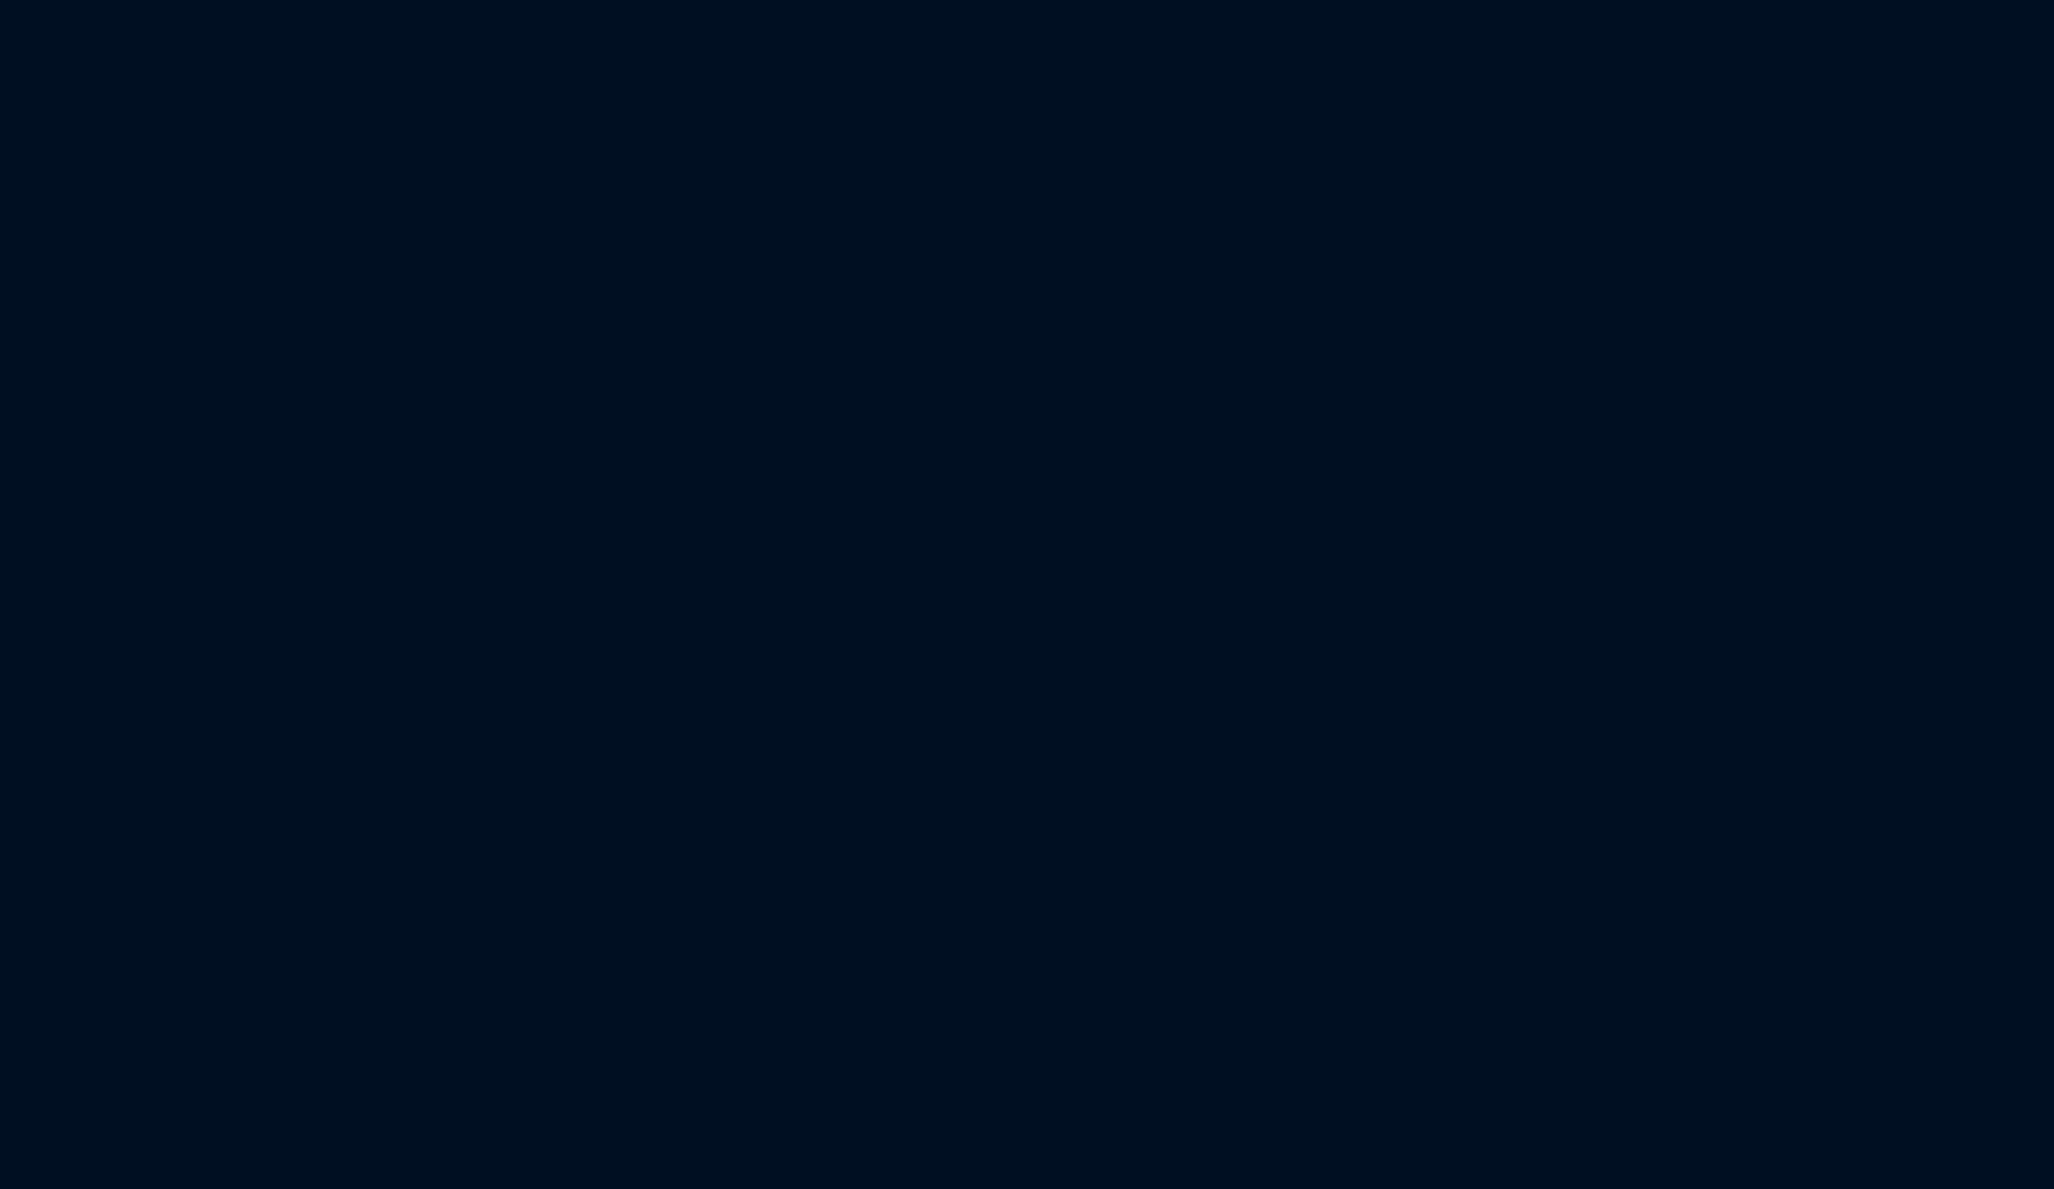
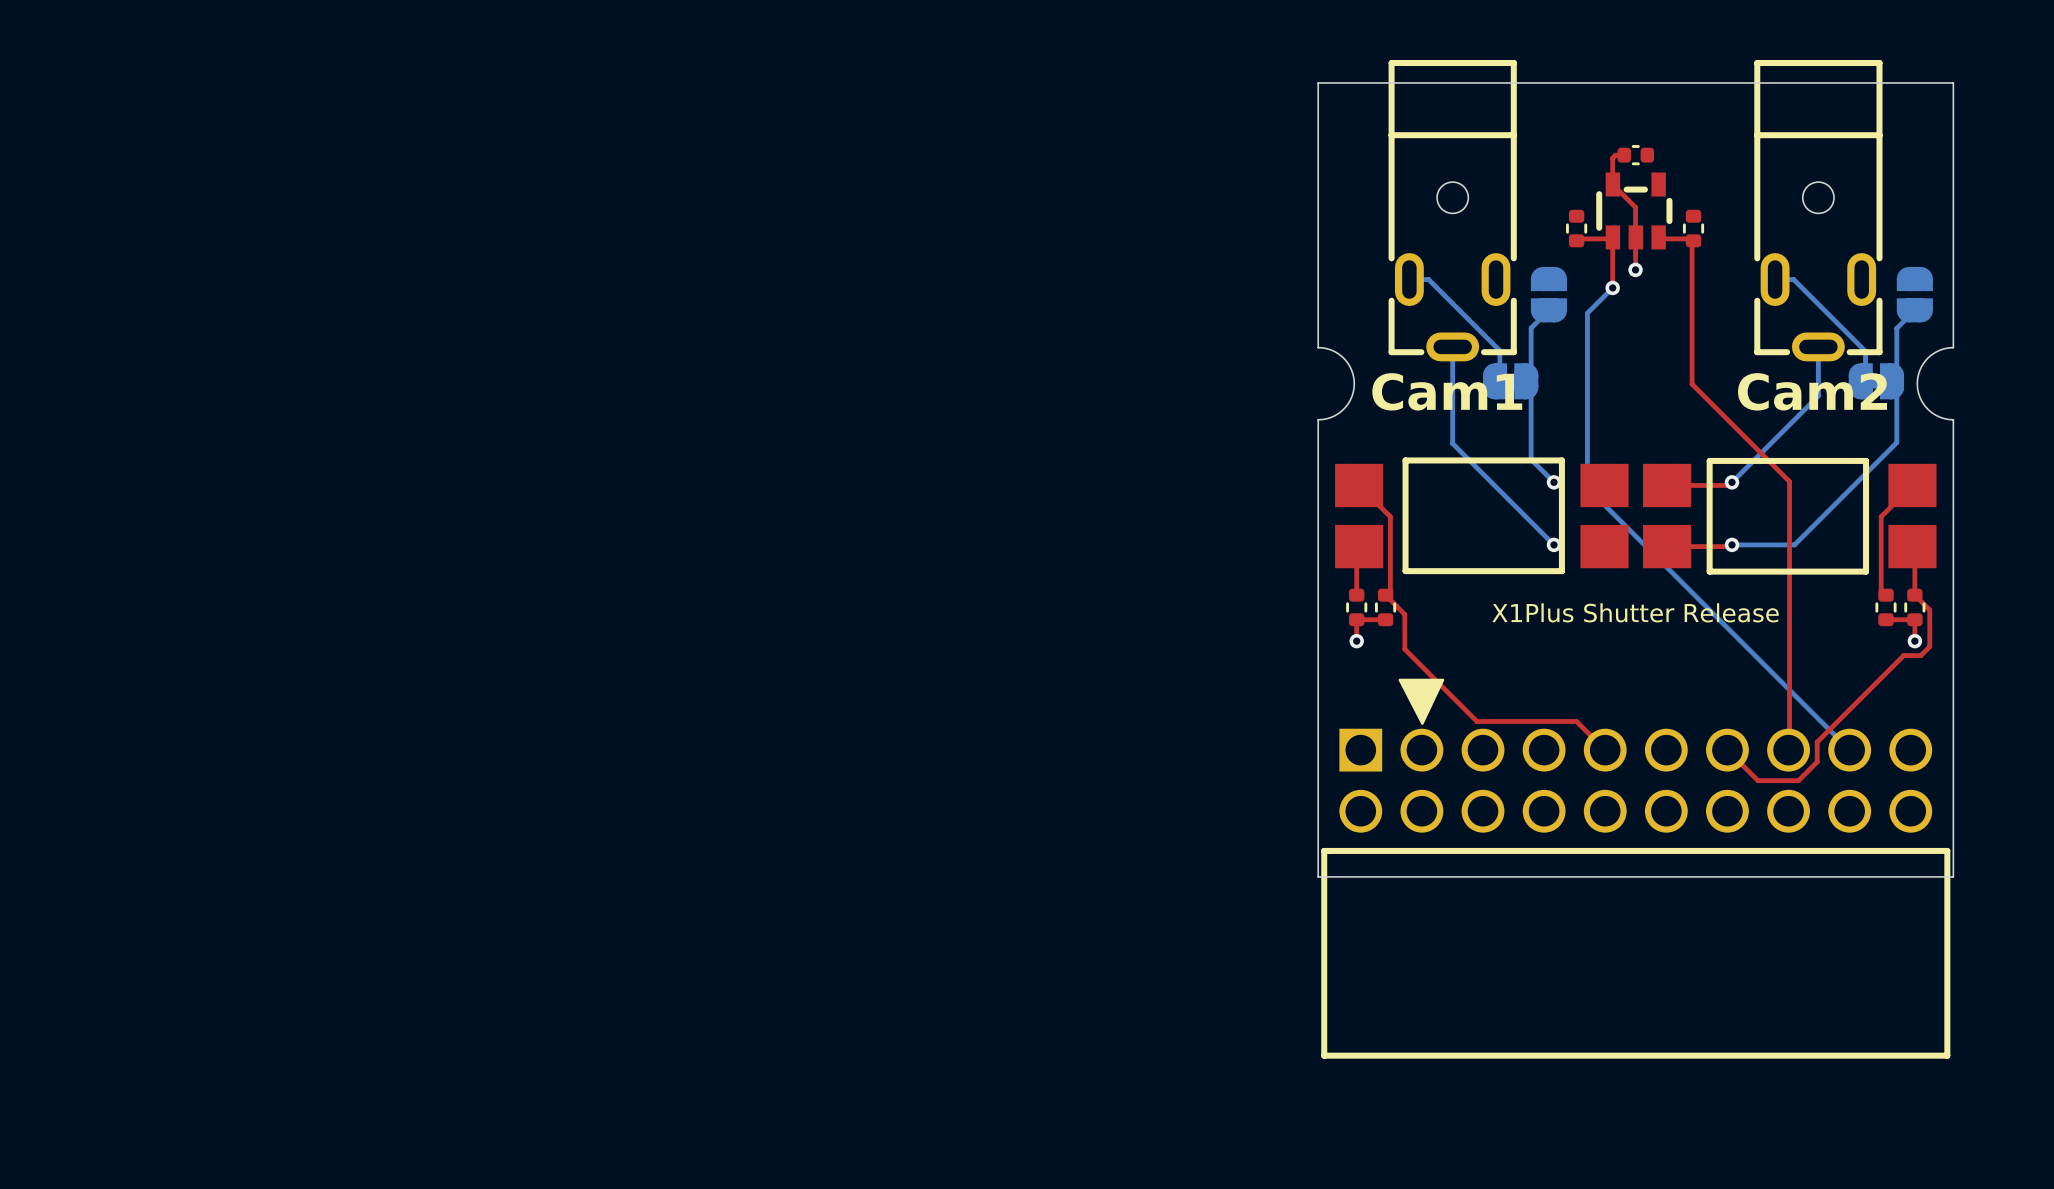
board edge: none -> (1318, 82) (1318, 347) (1334, 351) (1345, 359) (1351, 370) (1354, 383) (1351, 396) (1345, 407) (1334, 415) (1318, 419) (1318, 876) (1953, 876) (1953, 419) (1939, 417) (1927, 409) (1920, 397) (1917, 383) (1920, 369) (1927, 358) (1939, 350) (1953, 347) (1953, 82) (1318, 82)
top track: none -> (1624, 155) (1615, 155) (1612, 158) (1612, 184) (1635, 207) (1635, 269)
part: none -> (1635, 155)
part: none -> (1452, 210)
part: none -> (1634, 210)
part: none -> (1818, 210)
part: none -> (1576, 228)
part: none -> (1693, 228)
top track: none -> (1658, 237) (1692, 238) (1692, 384) (1789, 481) (1788, 750)
top track: none -> (1576, 238) (1612, 237) (1612, 287)
via: none -> (1635, 269)
bottom track: none -> (1409, 279) (1428, 279) (1499, 350) (1499, 381)
bottom track: none -> (1775, 279) (1793, 279) (1865, 351) (1865, 381)
bottom track: none -> (1612, 287) (1587, 313) (1587, 487) (1849, 750)
via: none -> (1612, 287)
part: none -> (1548, 294)
part: none -> (1914, 294)
bottom track: none -> (1548, 310) (1531, 328) (1531, 459) (1553, 482)
bottom track: none -> (1914, 310) (1896, 328) (1896, 442) (1794, 544) (1732, 544)
bottom track: none -> (1452, 346) (1452, 443) (1553, 544)
bottom track: none -> (1818, 346) (1818, 395) (1732, 482)
part: none -> (1510, 381)
part: none -> (1876, 381)
text: none -> Cam1 (1447, 391)
text: none -> Cam2 (1812, 391)
via: none -> (1553, 482)
top track: none -> (1732, 482) (1728, 485) (1667, 485)
via: none -> (1732, 482)
top track: none -> (1359, 485) (1390, 516) (1390, 590) (1385, 595) (1404, 614) (1404, 649) (1477, 721) (1576, 721) (1605, 750)
top track: none -> (1912, 485) (1881, 516) (1881, 590) (1886, 595)
part: none -> (1481, 515)
part: none -> (1789, 516)
via: none -> (1553, 544)
top track: none -> (1732, 544) (1730, 546) (1667, 546)
via: none -> (1732, 544)
top track: none -> (1356, 549) (1356, 595)
top track: none -> (1914, 549) (1914, 595) (1929, 610) (1929, 646) (1920, 655) (1903, 655) (1817, 742) (1817, 761) (1798, 780) (1758, 780) (1727, 750)
part: none -> (1356, 607)
part: none -> (1385, 607)
part: none -> (1886, 607)
part: none -> (1914, 607)
text: none -> X1Plus Shutter Release (1635, 612)
top track: none -> (1385, 619) (1356, 619) (1356, 641)
top track: none -> (1886, 619) (1914, 619) (1914, 641)
via: none -> (1356, 641)
via: none -> (1914, 641)
drawing: none -> [1398, 678, 1445, 725]
part: none -> (1635, 893)

